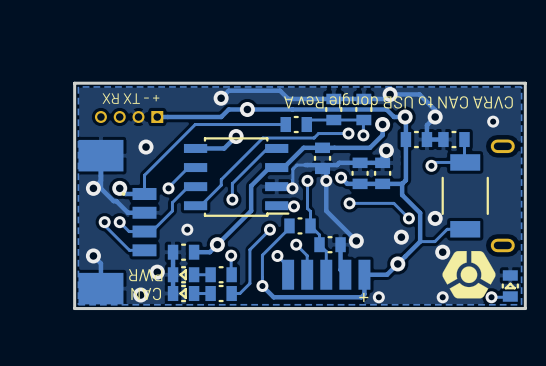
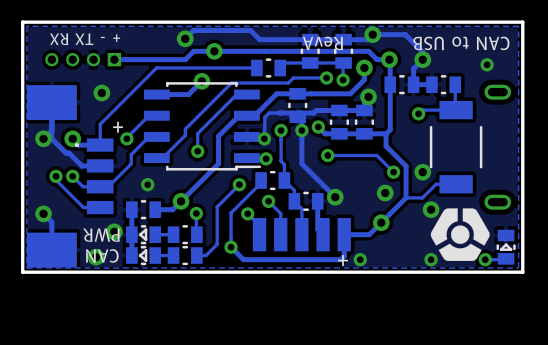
text: CVRA CAN to USB dongle Rev A (398, 100) -> CAN to USB RevA (406, 43)
text: none -> + (117, 127)

